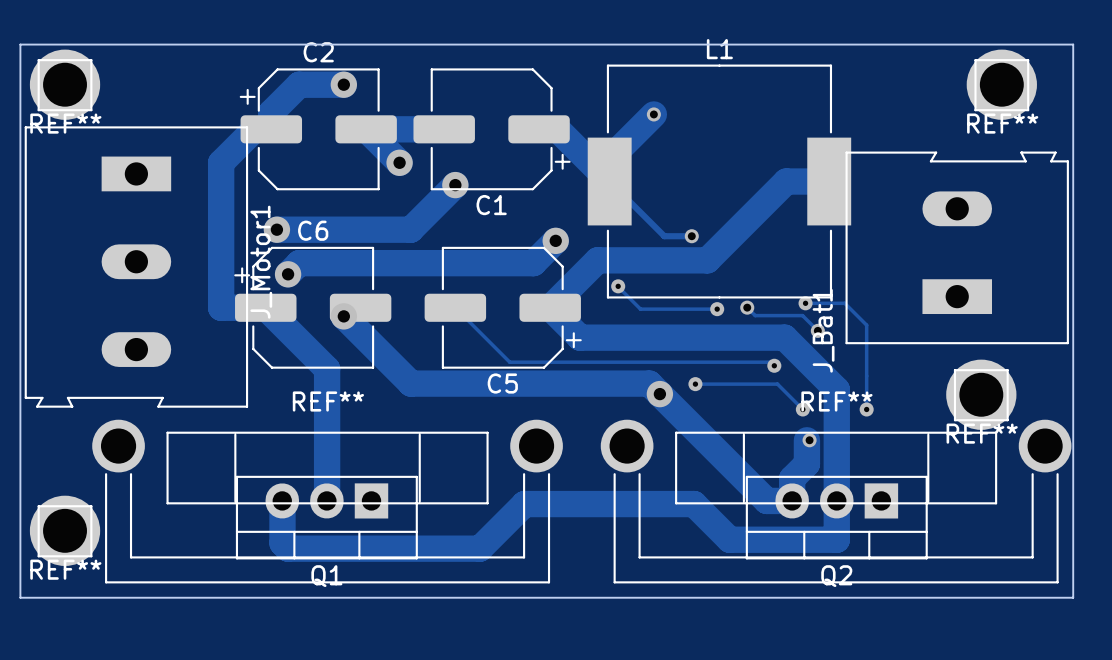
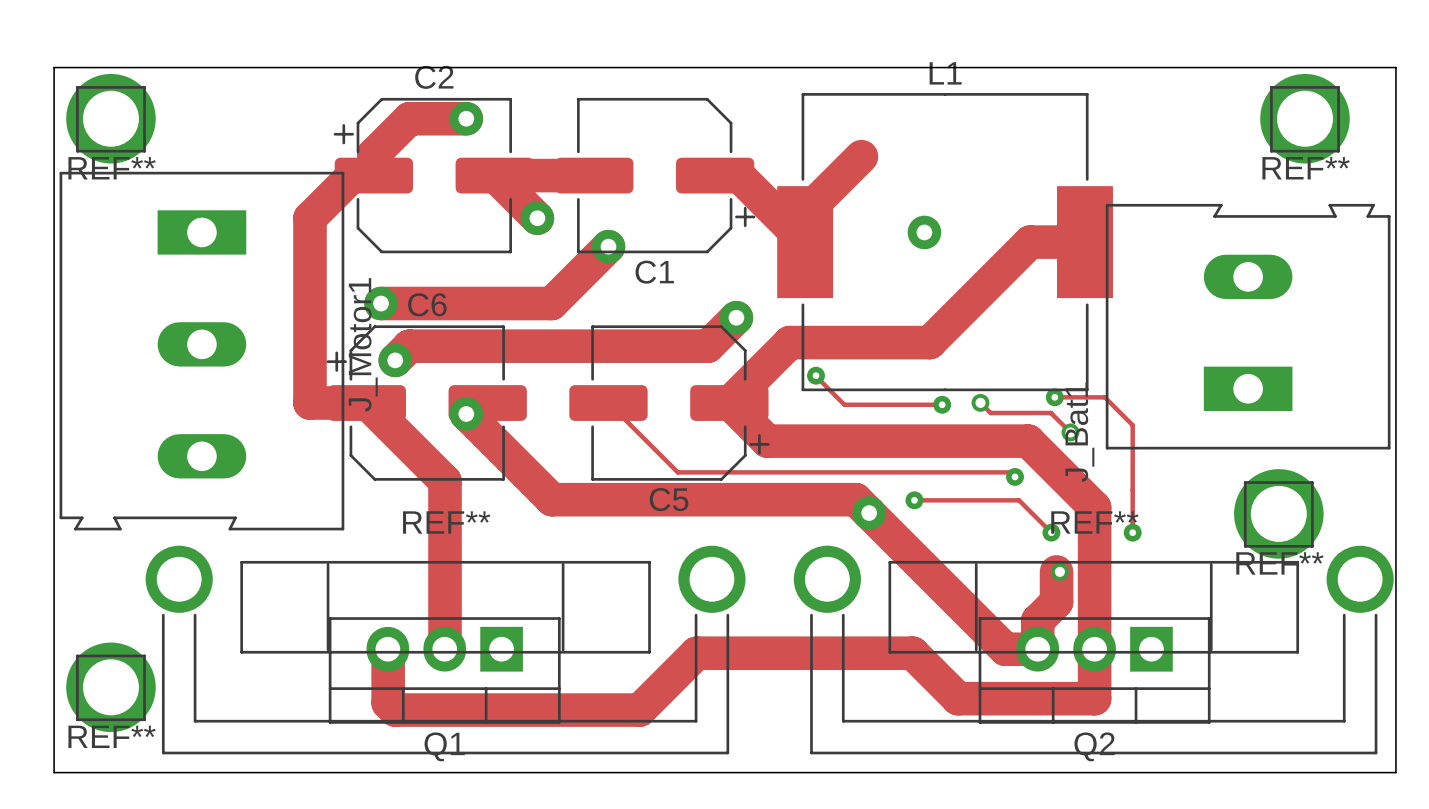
via: (653, 114) -> none
via: none -> (924, 232)
track: (609, 181) (664, 236) (691, 236) -> none
via: (691, 236) -> none

